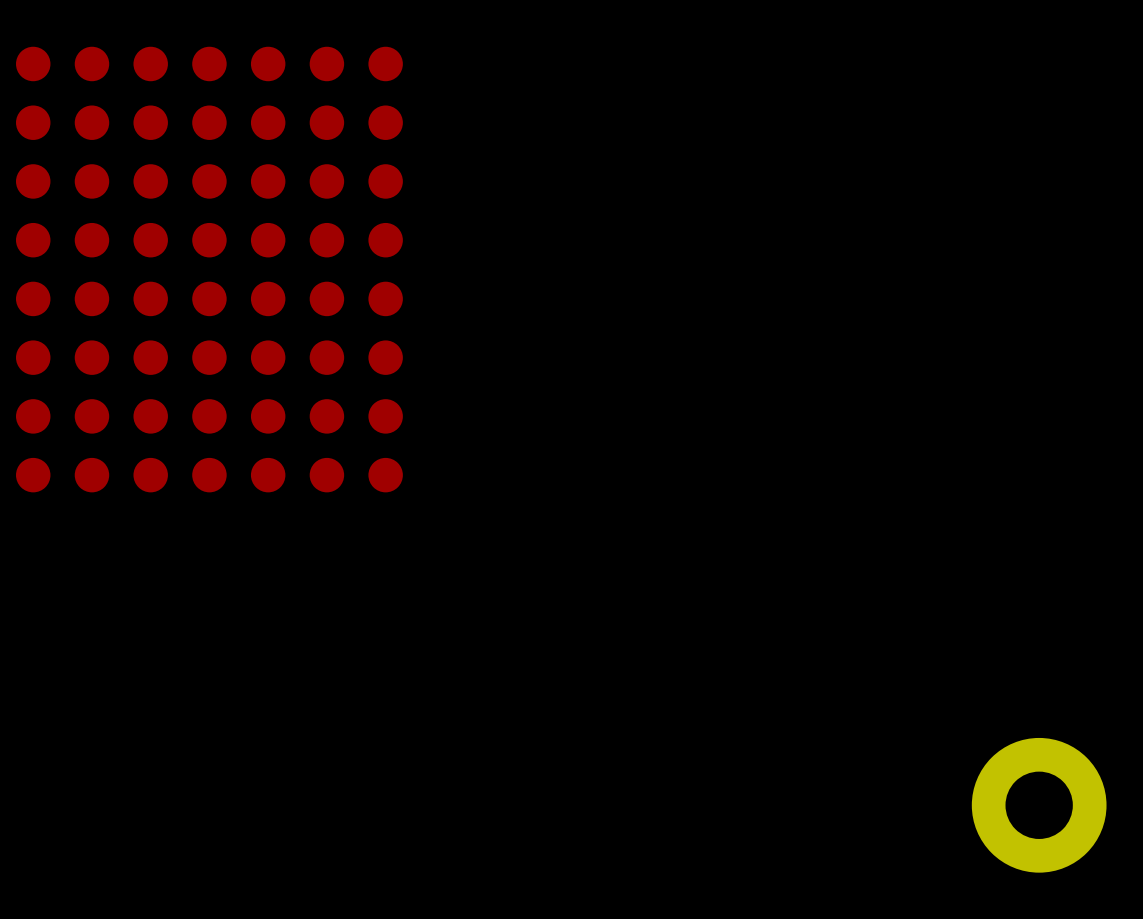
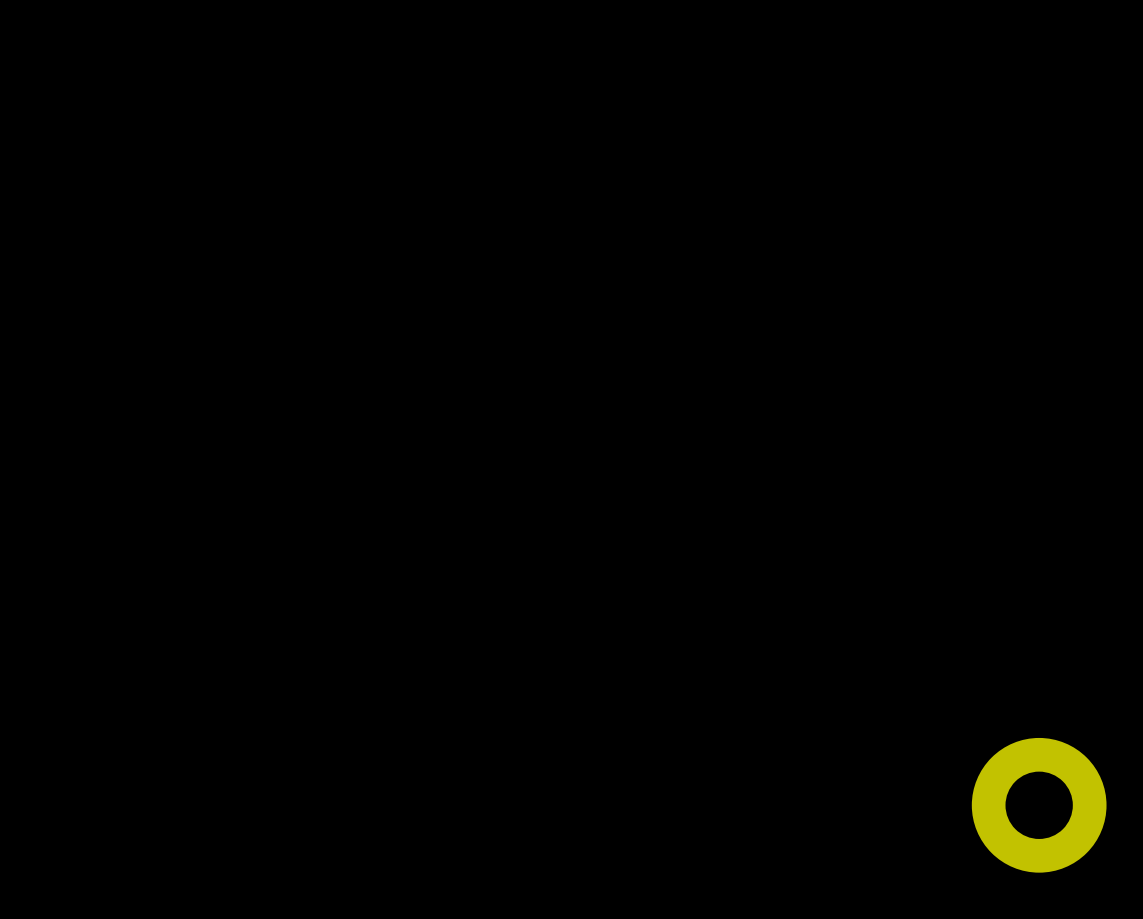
part: (33, 63) -> none
part: (91, 63) -> none
part: (150, 63) -> none
part: (209, 63) -> none
part: (268, 63) -> none
part: (326, 63) -> none
part: (385, 63) -> none
part: (33, 122) -> none
part: (91, 122) -> none
part: (150, 122) -> none
part: (209, 122) -> none
part: (268, 122) -> none
part: (326, 122) -> none
part: (385, 122) -> none
part: (33, 181) -> none
part: (91, 181) -> none
part: (150, 181) -> none
part: (209, 181) -> none
part: (268, 181) -> none
part: (326, 181) -> none
part: (385, 181) -> none
part: (33, 240) -> none
part: (91, 240) -> none
part: (150, 240) -> none
part: (209, 240) -> none
part: (268, 240) -> none
part: (326, 240) -> none
part: (385, 240) -> none
part: (33, 298) -> none
part: (91, 298) -> none
part: (150, 298) -> none
part: (209, 298) -> none
part: (268, 298) -> none
part: (326, 298) -> none
part: (385, 298) -> none
part: (33, 357) -> none
part: (91, 357) -> none
part: (150, 357) -> none
part: (209, 357) -> none
part: (268, 357) -> none
part: (326, 357) -> none
part: (385, 357) -> none
part: (33, 416) -> none
part: (91, 416) -> none
part: (150, 416) -> none
part: (209, 416) -> none
part: (268, 416) -> none
part: (326, 416) -> none
part: (385, 416) -> none
part: (33, 475) -> none
part: (91, 475) -> none
part: (150, 475) -> none
part: (209, 475) -> none
part: (268, 475) -> none
part: (326, 475) -> none
part: (385, 475) -> none

